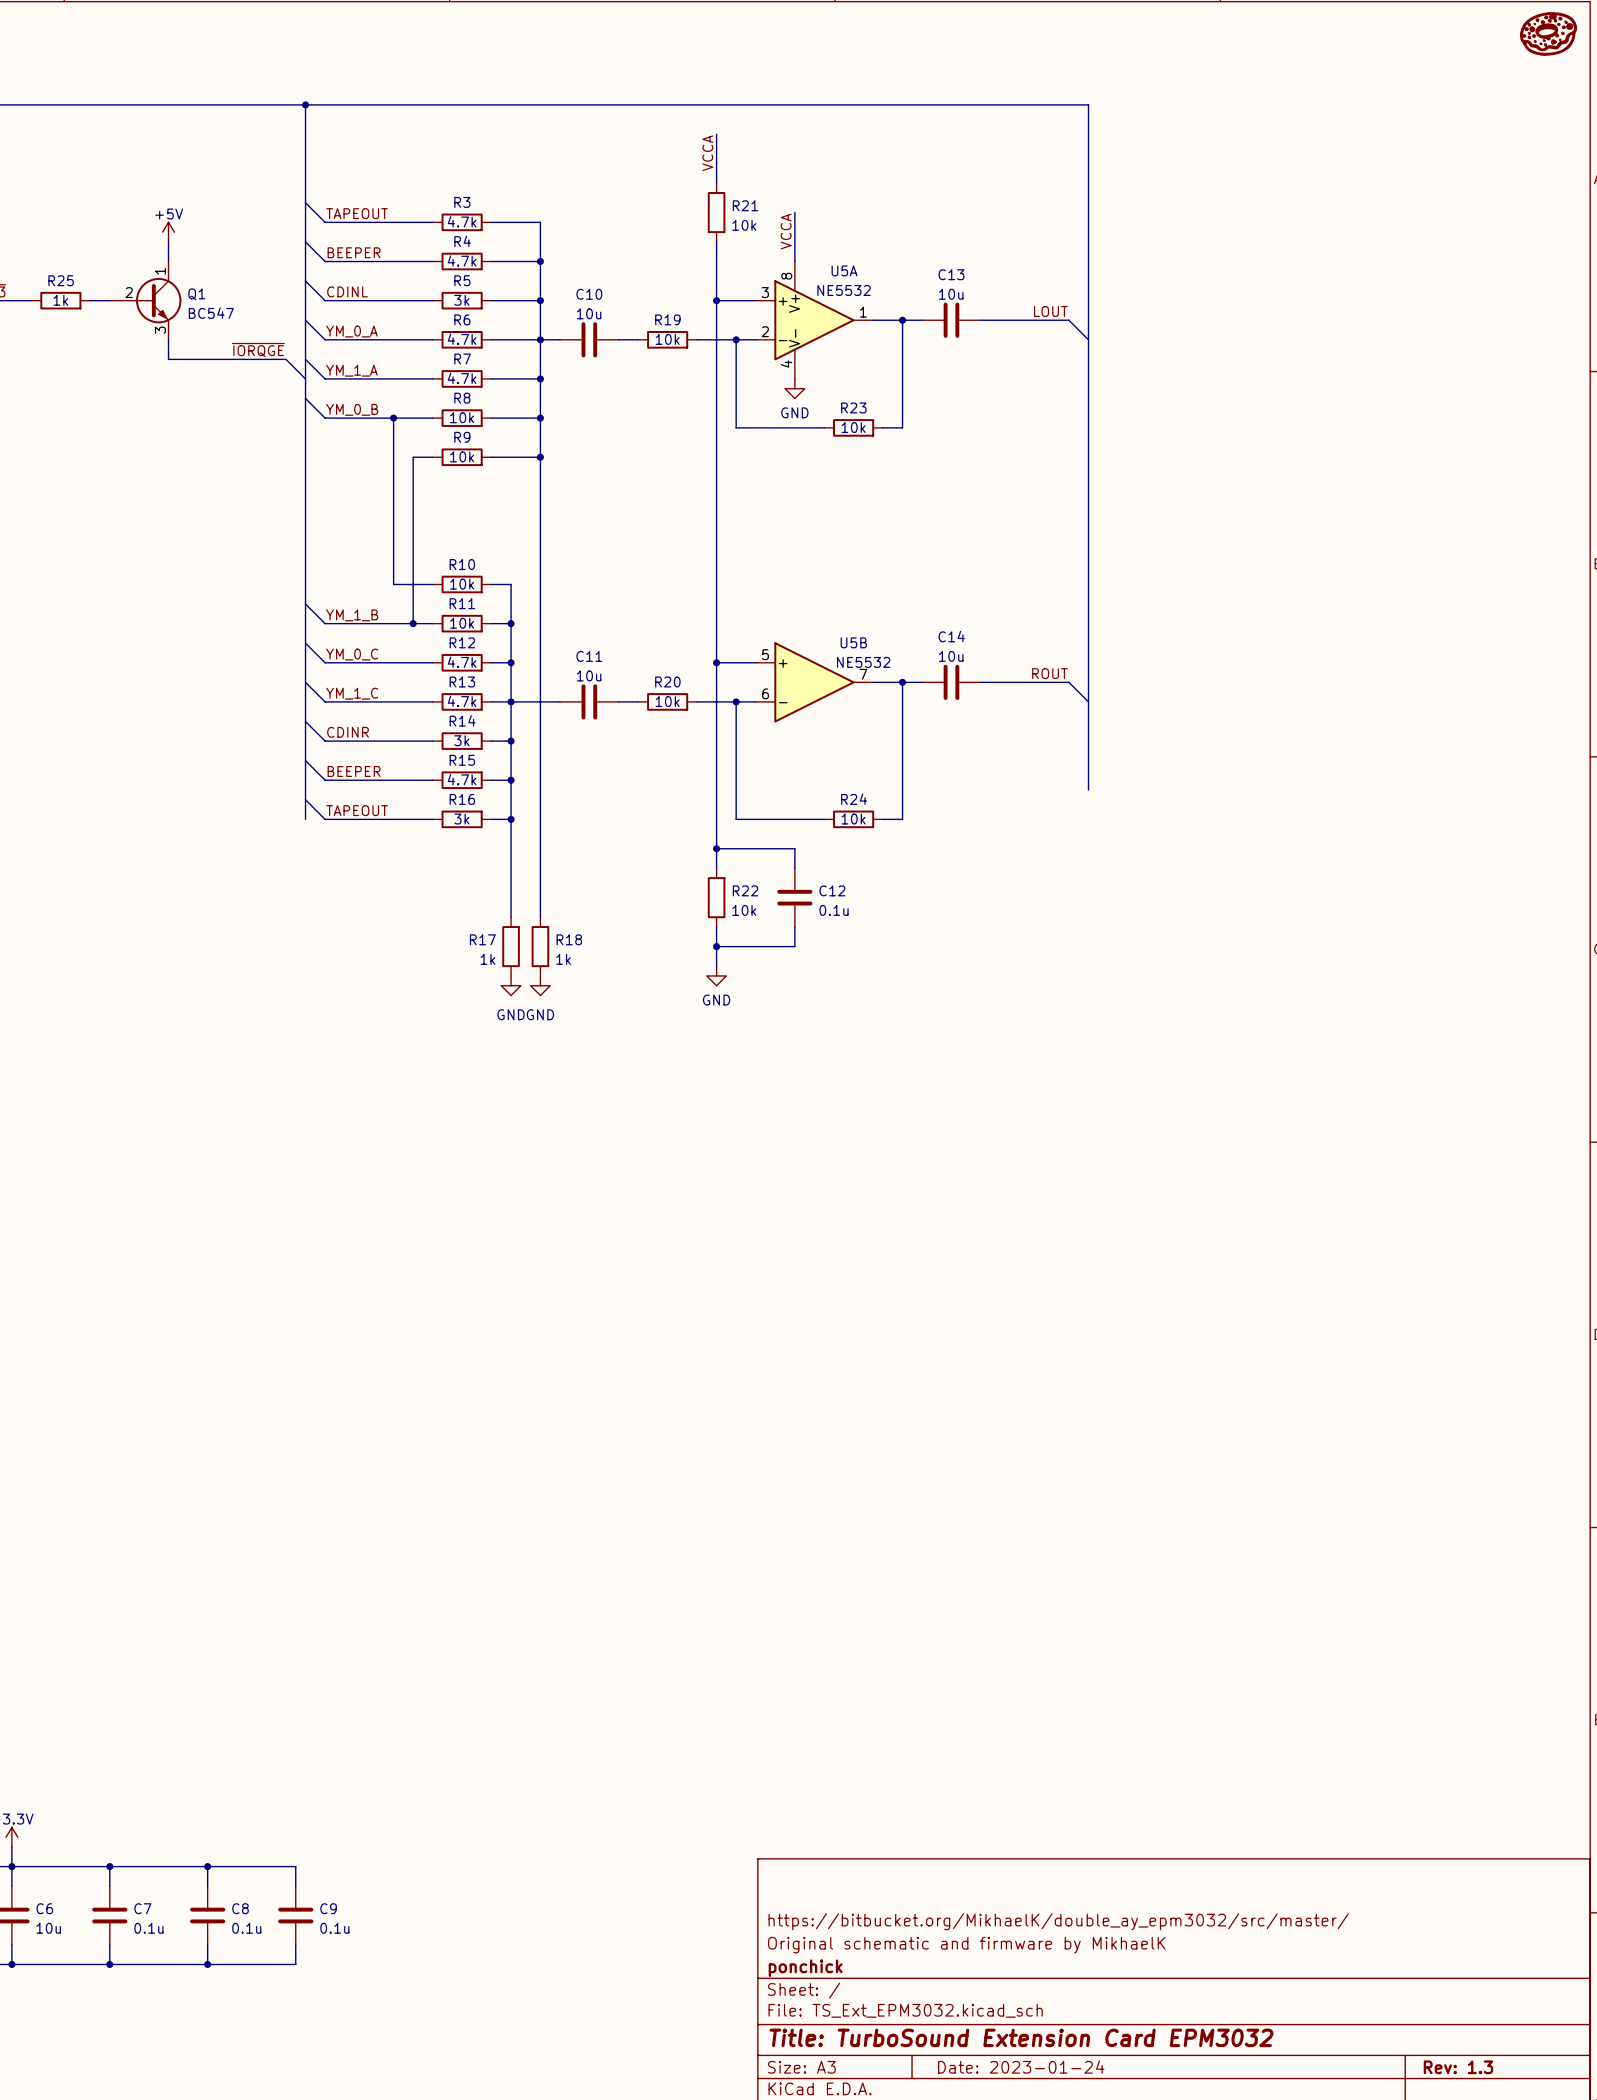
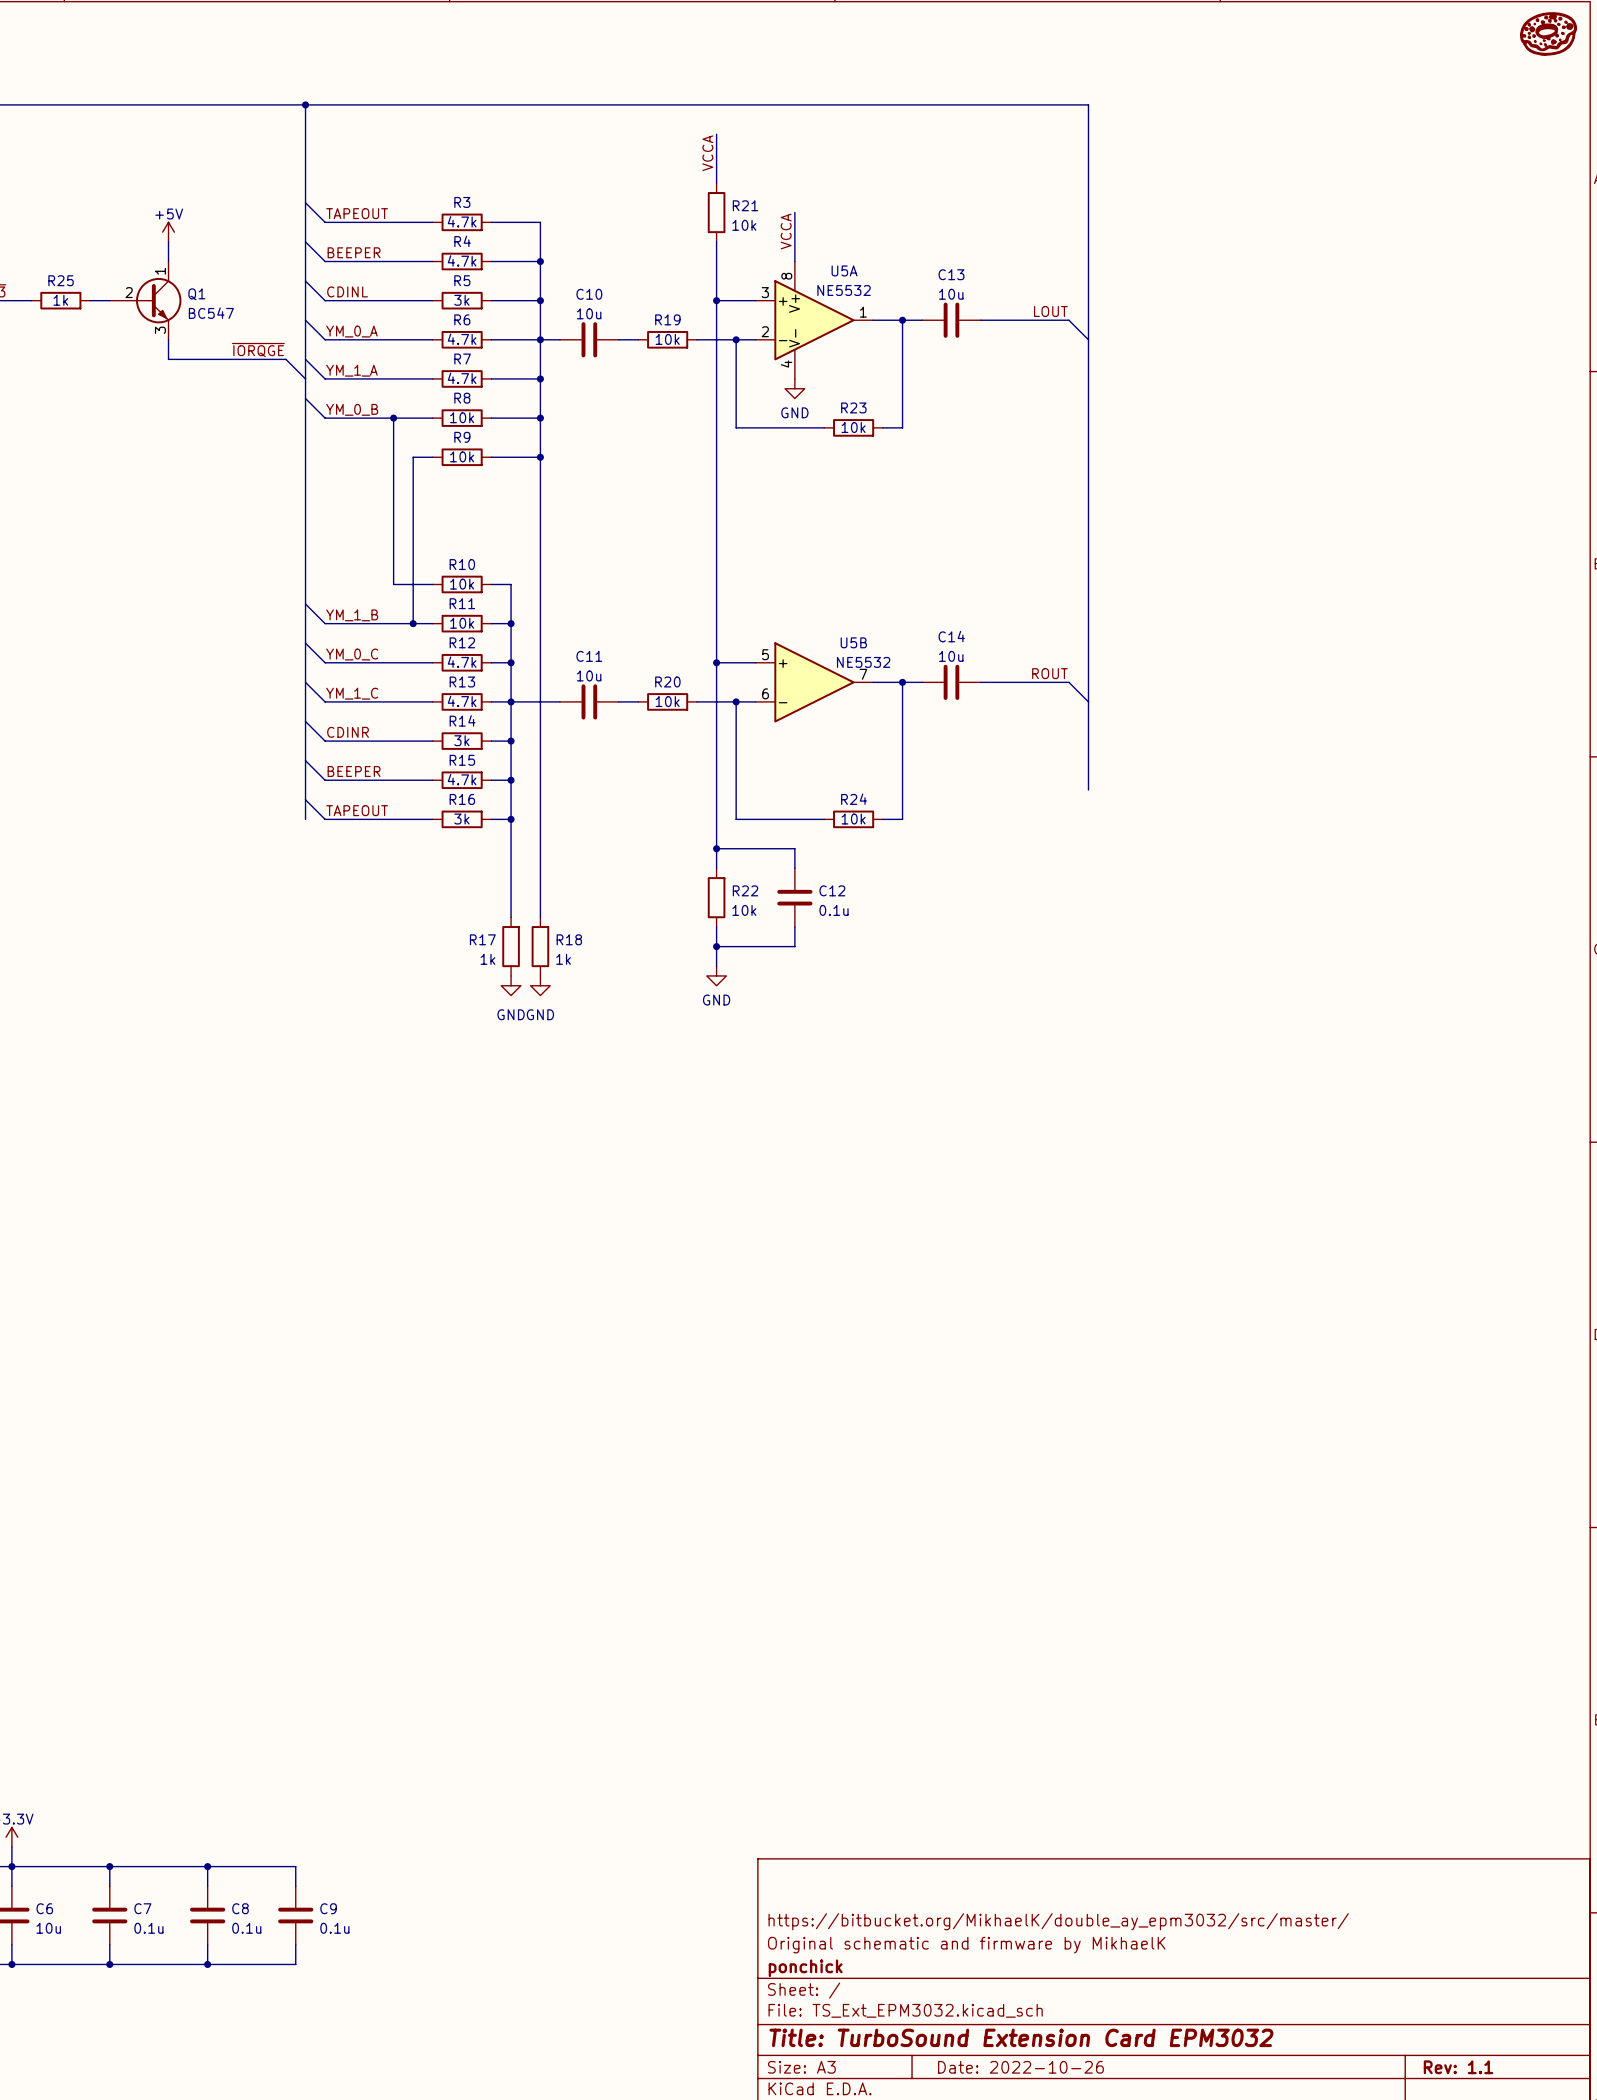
title block: Date: 2023-01-24 (1021, 2067) -> Date: 2022-10-26 (1020, 2067)
title block: Rev: 1.3 (1458, 2067) -> Rev: 1.1 (1458, 2067)

